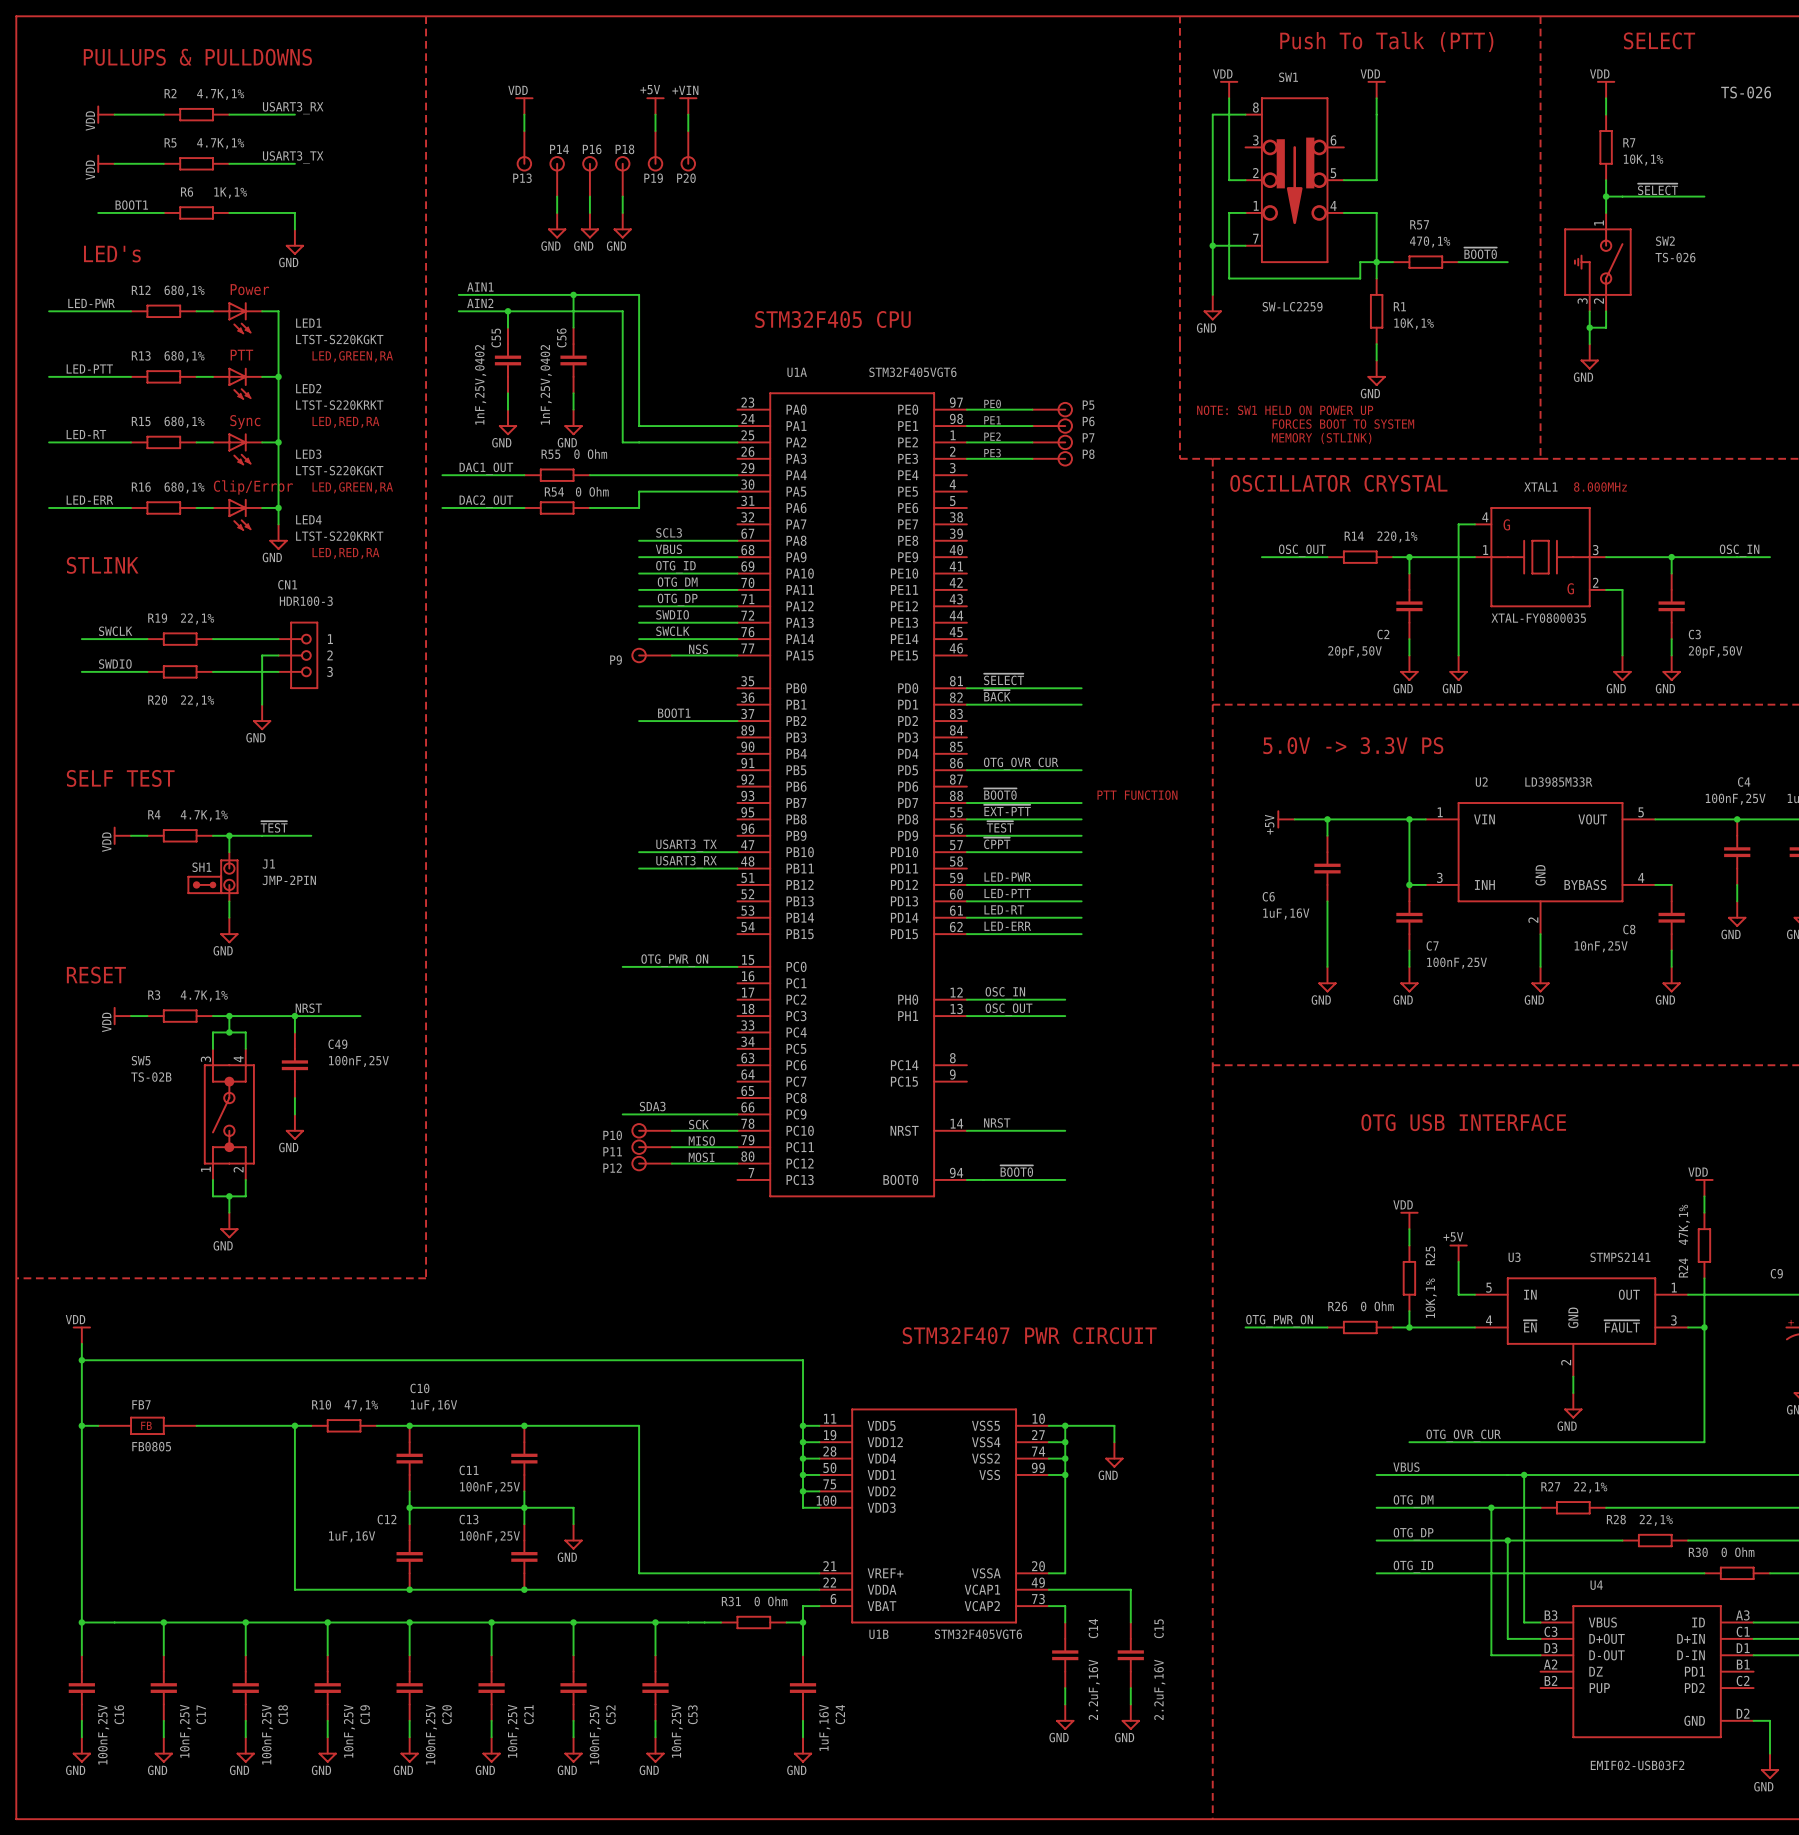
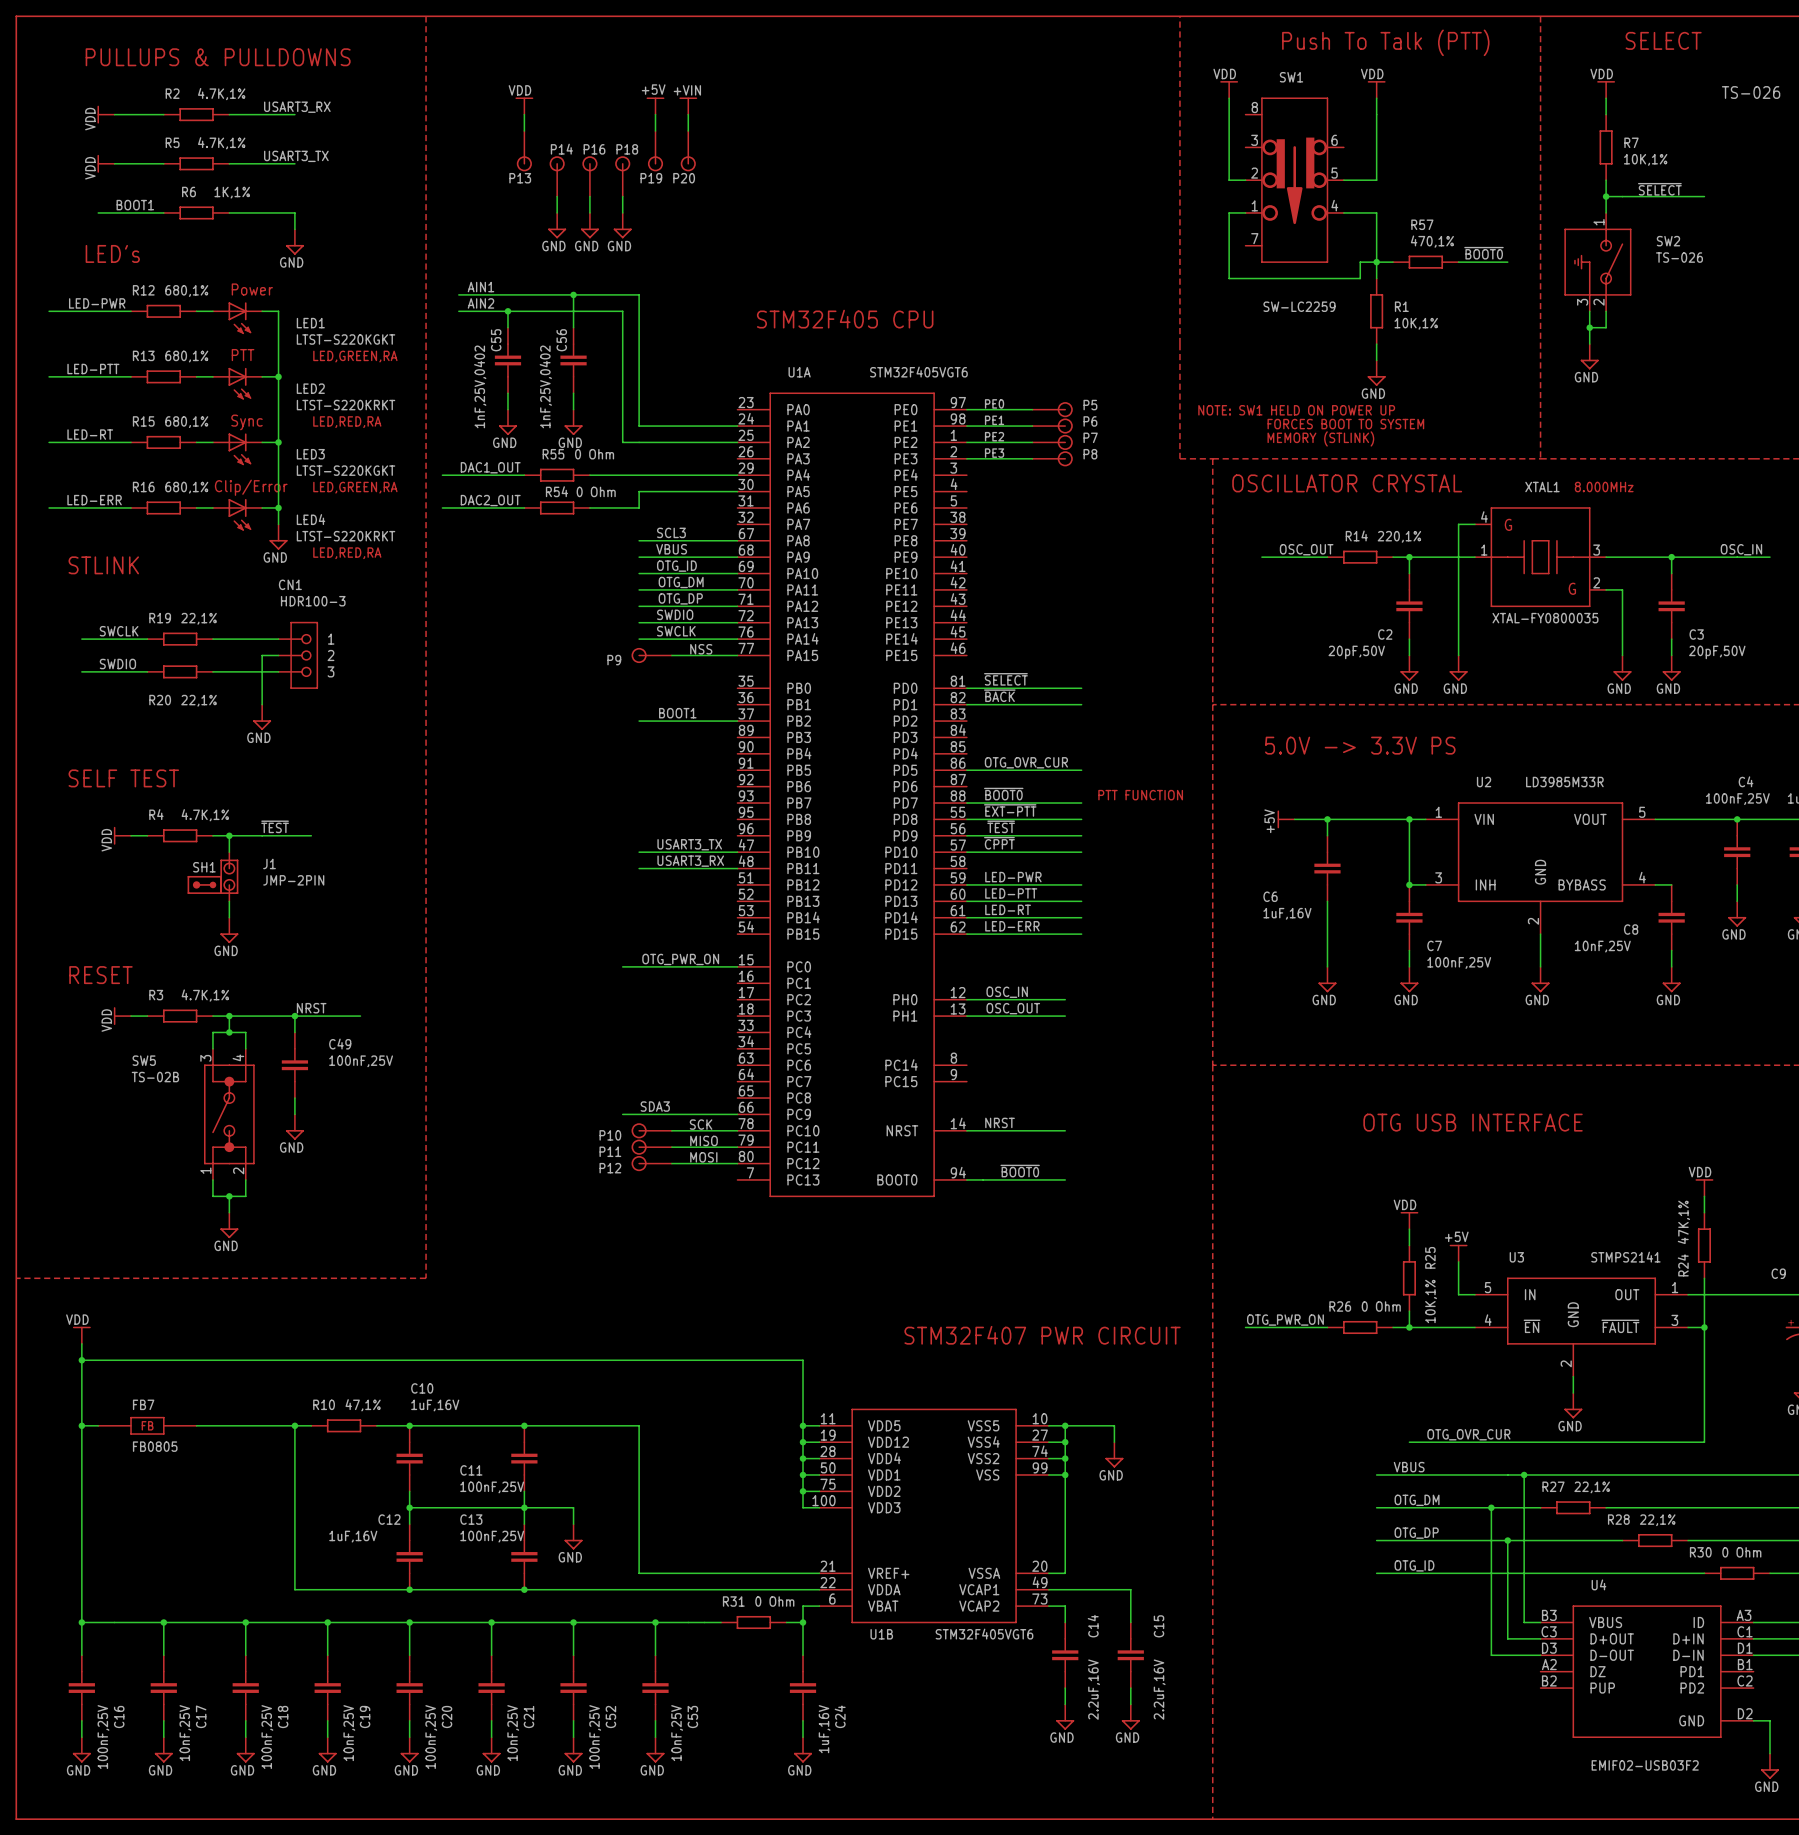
wire: (1245, 114) (1212, 114) (1212, 294) -> none
wire: (1212, 245) (1245, 245) -> none
junction: (1212, 245) -> none
power symbol: GND (1212, 307) -> none

